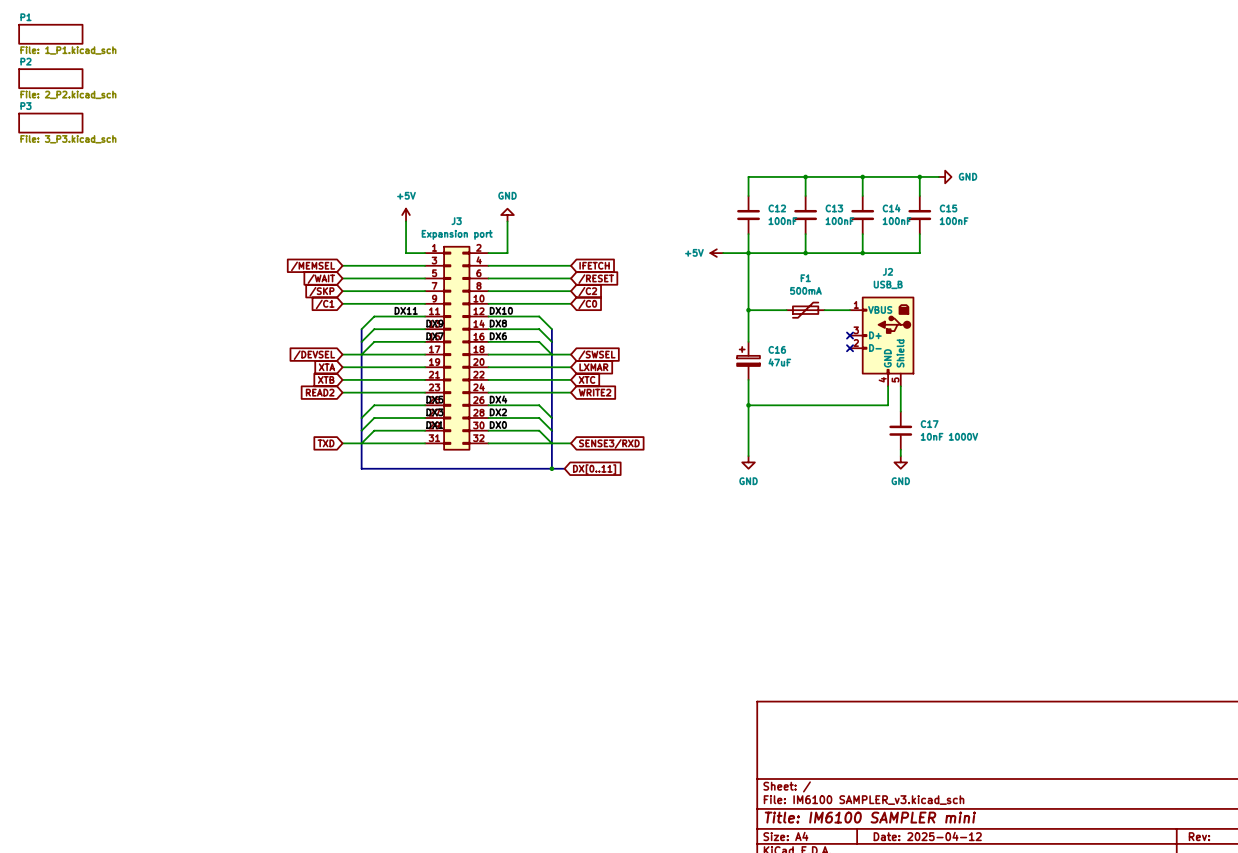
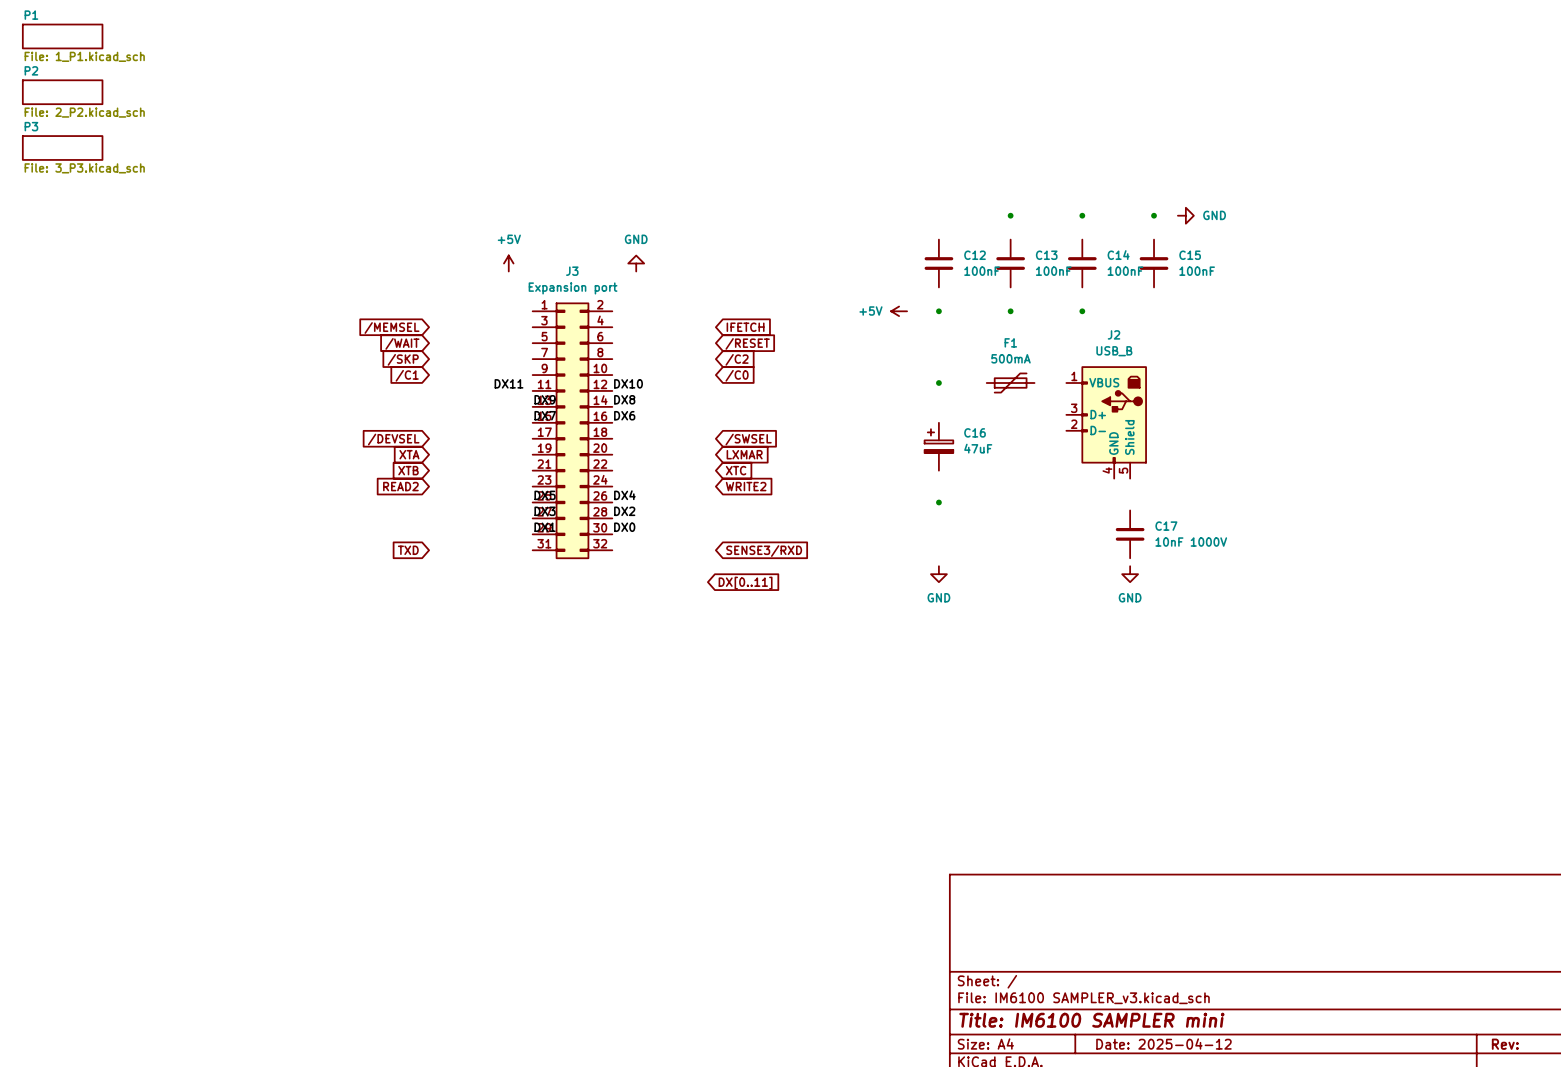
wire: (805, 176) (805, 196) -> none
wire: (862, 176) (862, 196) -> none
wire: (919, 176) (919, 196) -> none
wire: (938, 176) (748, 176) (748, 196) -> none
wire: (406, 221) (406, 253) (425, 253) -> none
wire: (507, 221) (507, 253) (488, 253) -> none
wire: (748, 234) (748, 341) -> none
wire: (805, 234) (805, 253) -> none
wire: (862, 234) (862, 253) -> none
wire: (919, 234) (919, 253) (723, 253) -> none
wire: (342, 265) (425, 265) -> none
wire: (488, 265) (570, 265) -> none
wire: (342, 278) (425, 278) -> none
wire: (488, 278) (570, 278) -> none
wire: (342, 291) (425, 291) -> none
wire: (488, 291) (570, 291) -> none
wire: (342, 303) (425, 303) -> none
wire: (488, 303) (570, 303) -> none
wire: (748, 310) (786, 310) -> none
wire: (824, 310) (850, 310) -> none
wire: (425, 316) (374, 316) (361, 329) -> none
wire: (488, 316) (539, 316) (551, 329) -> none
bus: (361, 329) (361, 468) (564, 468) -> none
wire: (425, 329) (374, 329) (361, 341) -> none
wire: (488, 329) (539, 329) (551, 341) -> none
bus: (551, 329) (551, 468) -> none
no-connect mark: (850, 335) -> none
wire: (425, 341) (374, 341) (361, 354) -> none
wire: (488, 341) (539, 341) (551, 354) -> none
no-connect mark: (850, 348) -> none
wire: (342, 354) (425, 354) -> none
wire: (488, 354) (570, 354) -> none
wire: (342, 367) (425, 367) -> none
wire: (488, 367) (570, 367) -> none
wire: (342, 379) (425, 379) -> none
wire: (488, 379) (570, 379) -> none
wire: (748, 379) (748, 456) -> none
wire: (888, 386) (888, 405) (748, 405) -> none
wire: (900, 386) (900, 411) -> none
wire: (342, 392) (425, 392) -> none
wire: (488, 392) (570, 392) -> none
wire: (425, 405) (374, 405) (361, 418) -> none
wire: (488, 405) (539, 405) (551, 418) -> none
wire: (425, 418) (374, 418) (361, 430) -> none
wire: (488, 418) (539, 418) (551, 430) -> none
wire: (425, 430) (374, 430) (361, 443) -> none
wire: (488, 430) (539, 430) (551, 443) -> none
wire: (342, 443) (425, 443) -> none
wire: (488, 443) (570, 443) -> none
wire: (900, 449) (900, 456) -> none
junction: (551, 468) -> none

